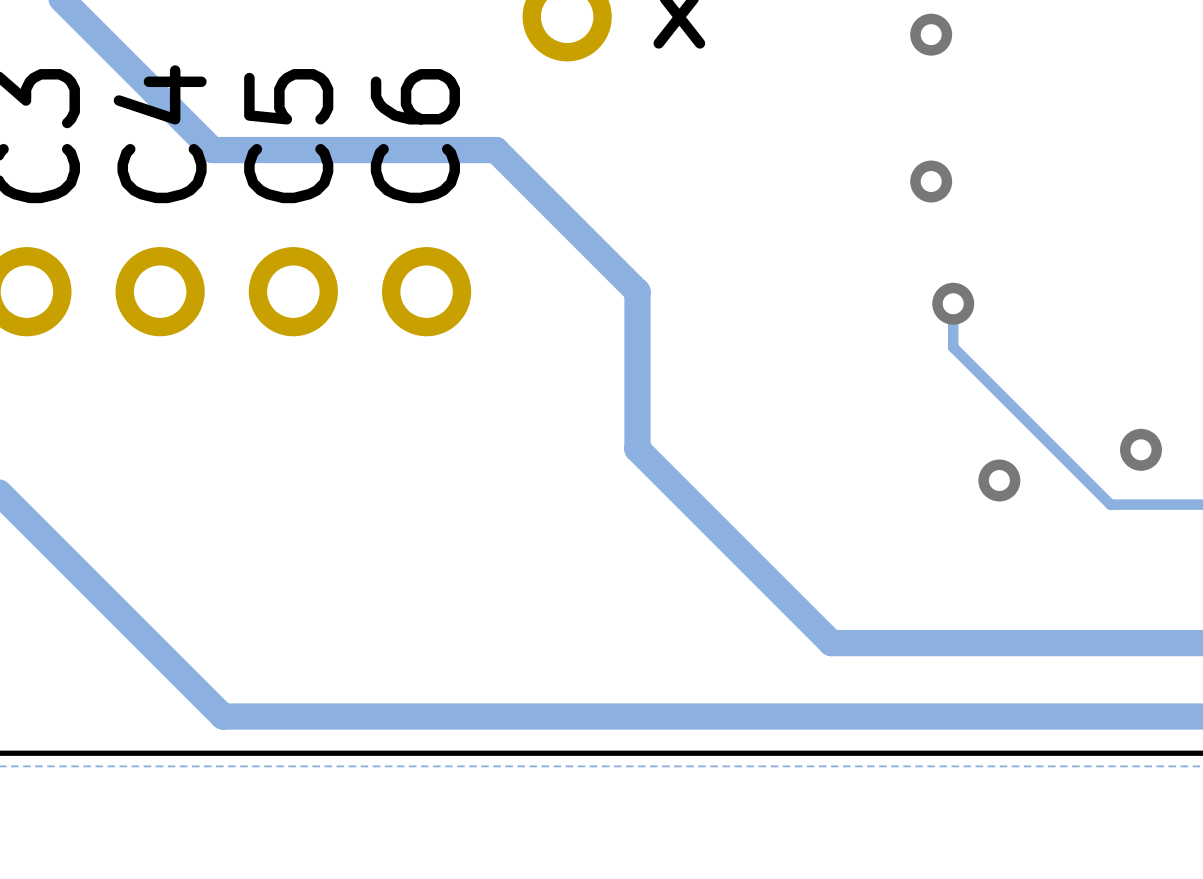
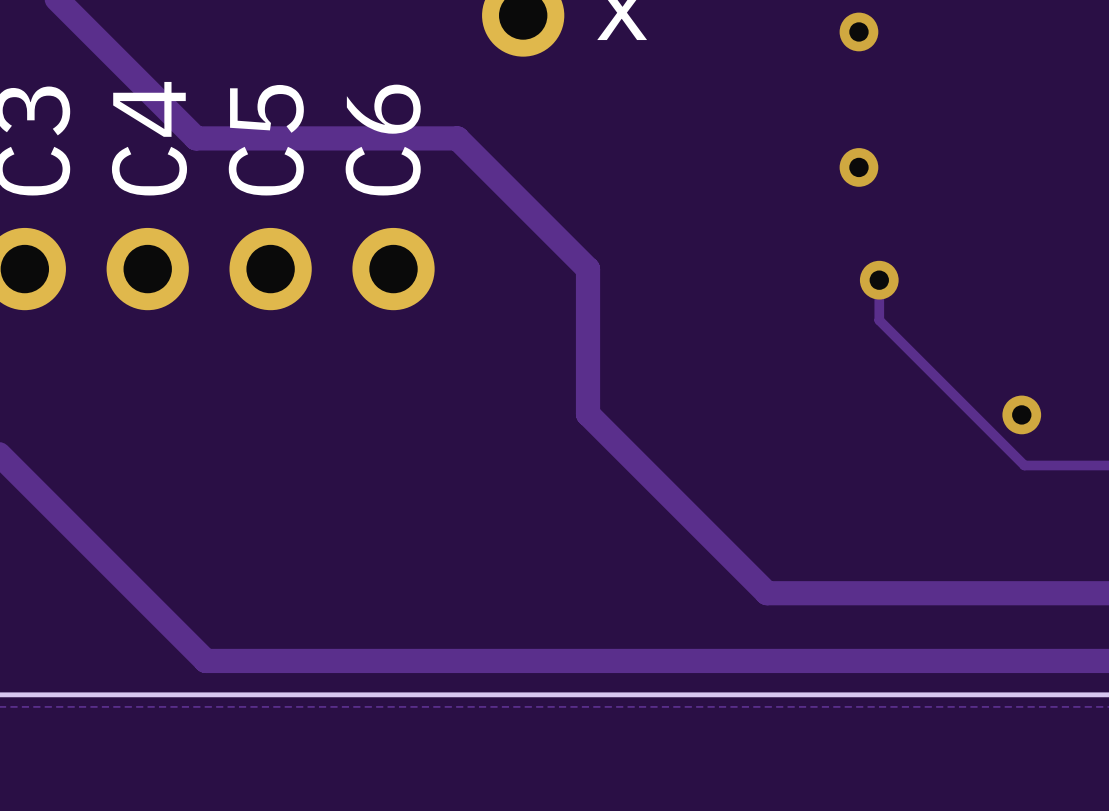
via position: (1140, 449) -> (1021, 414)
via: (999, 480) -> none

